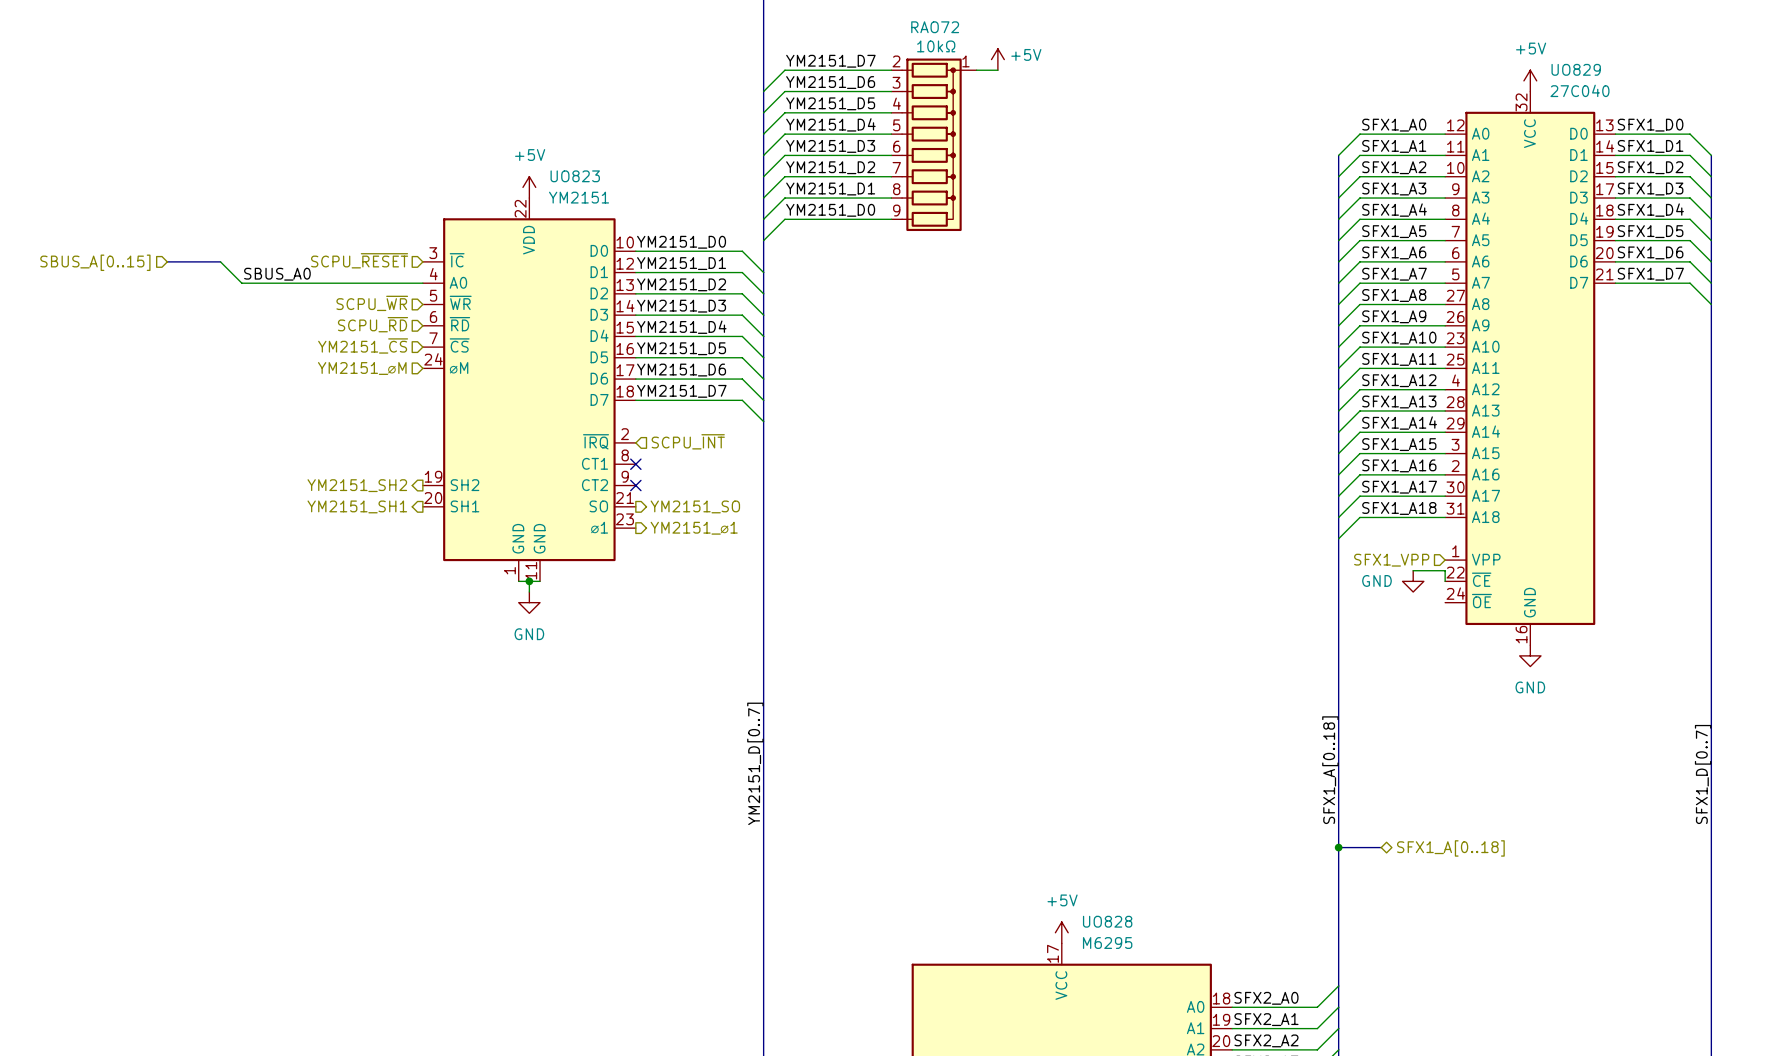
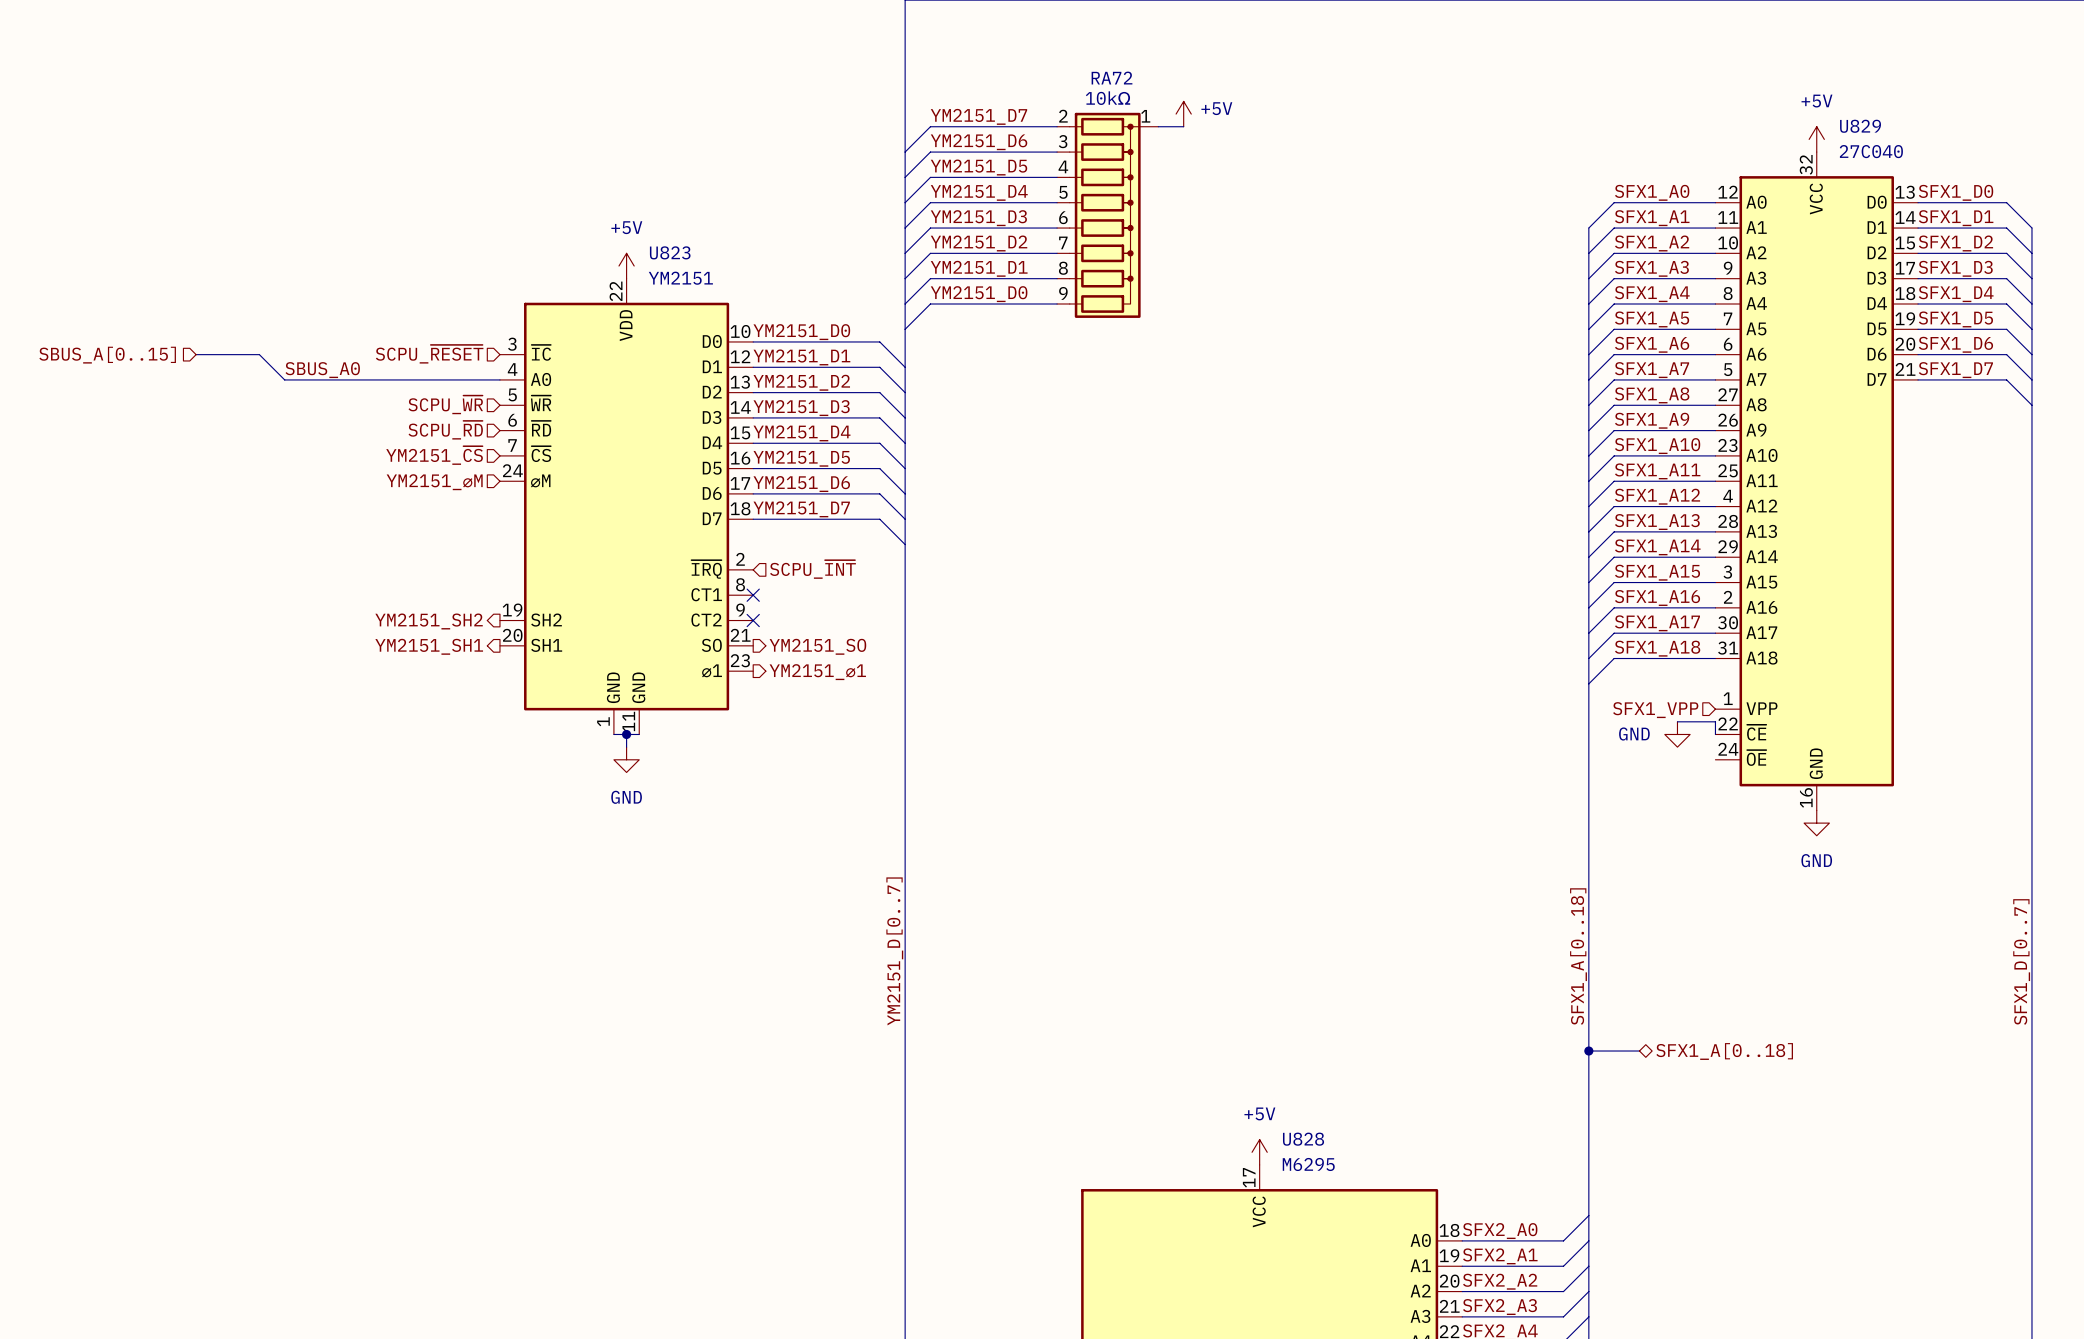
RAO72 name: RAO72 (935, 27) -> RA72 (1112, 78)
UO829 name: UO829 (1576, 69) -> U829 (1860, 126)
UO823 name: UO823 (575, 176) -> U823 (670, 252)
UO828 name: UO828 (1107, 921) -> U828 (1303, 1139)

